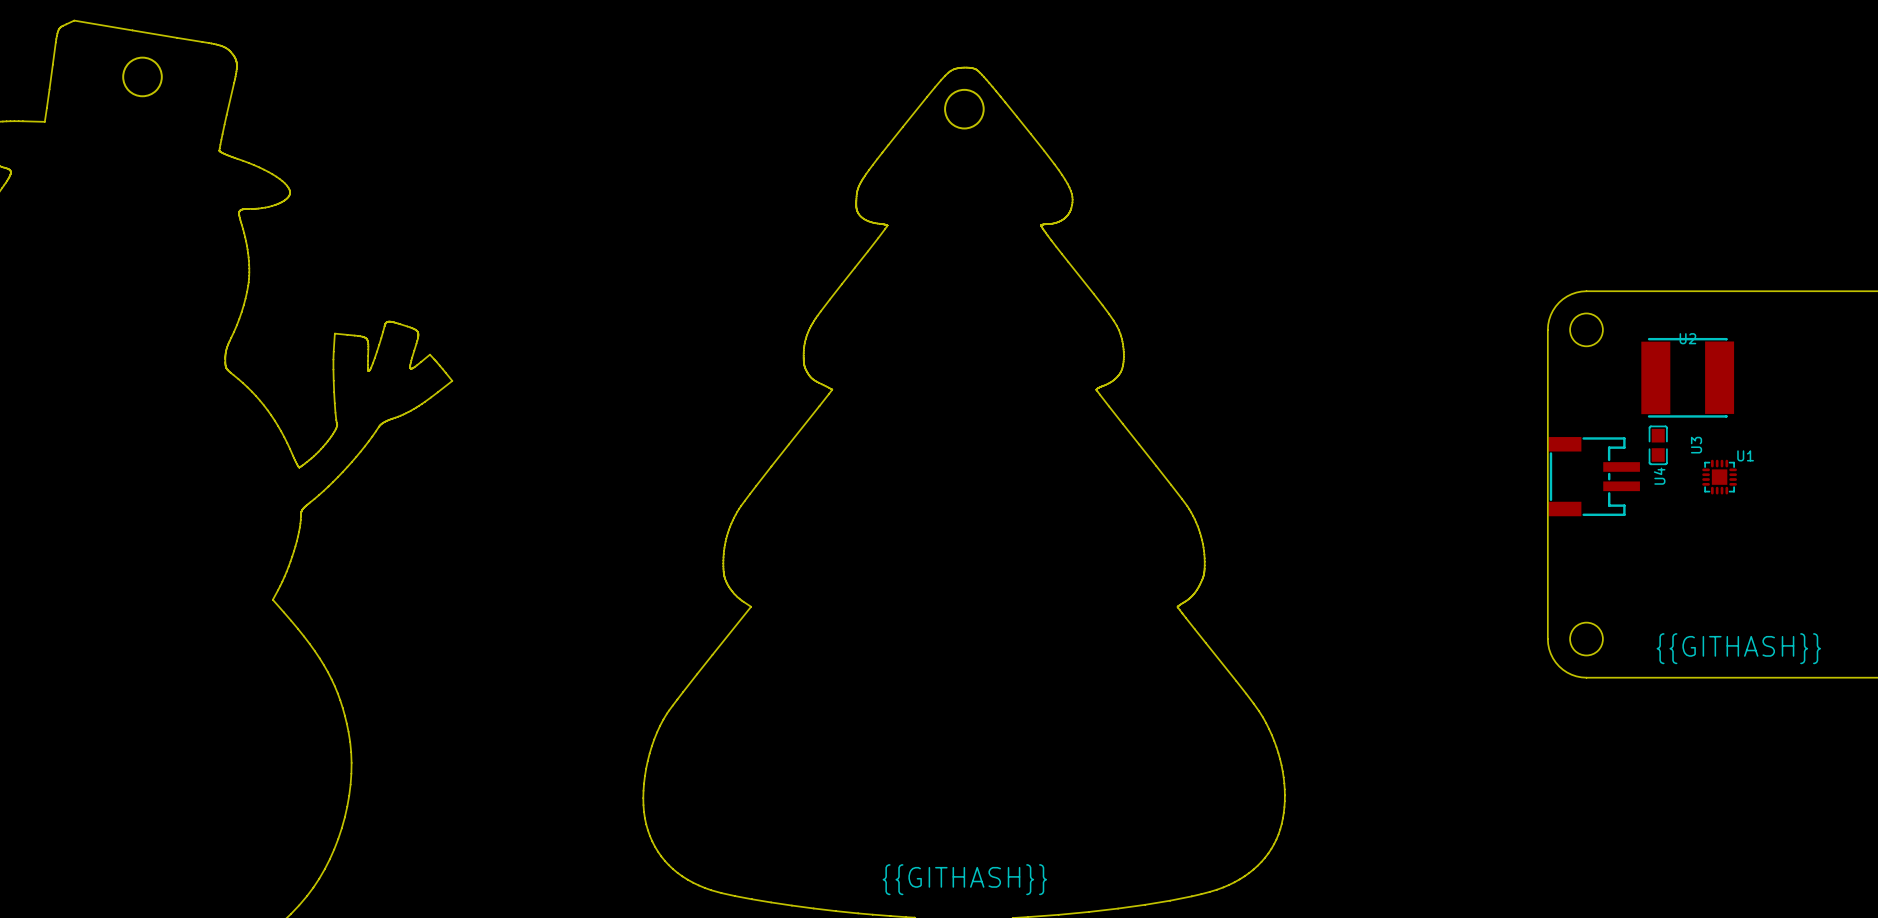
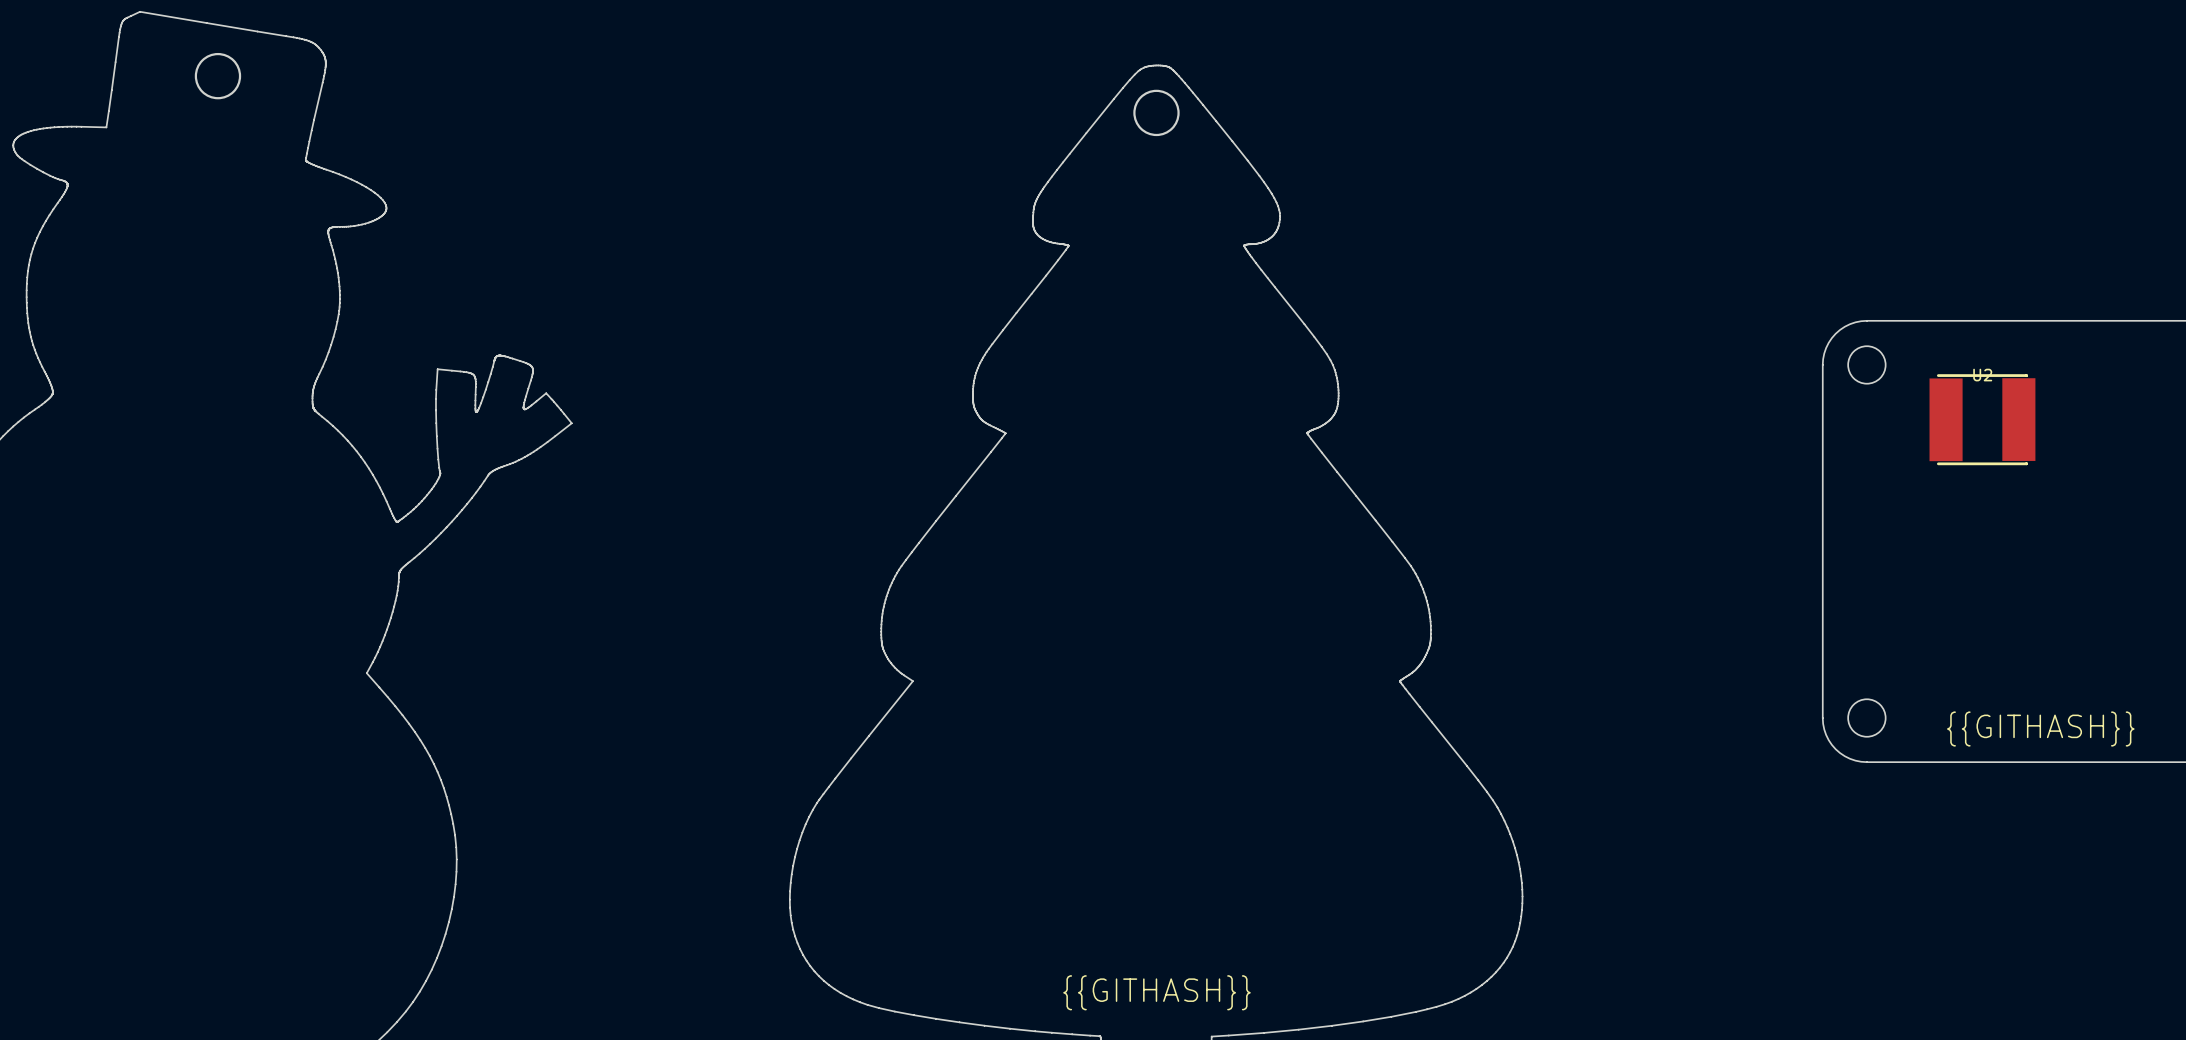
U3: (1658, 445) -> none
U4: (1594, 476) -> none
U1: (1719, 477) -> none

